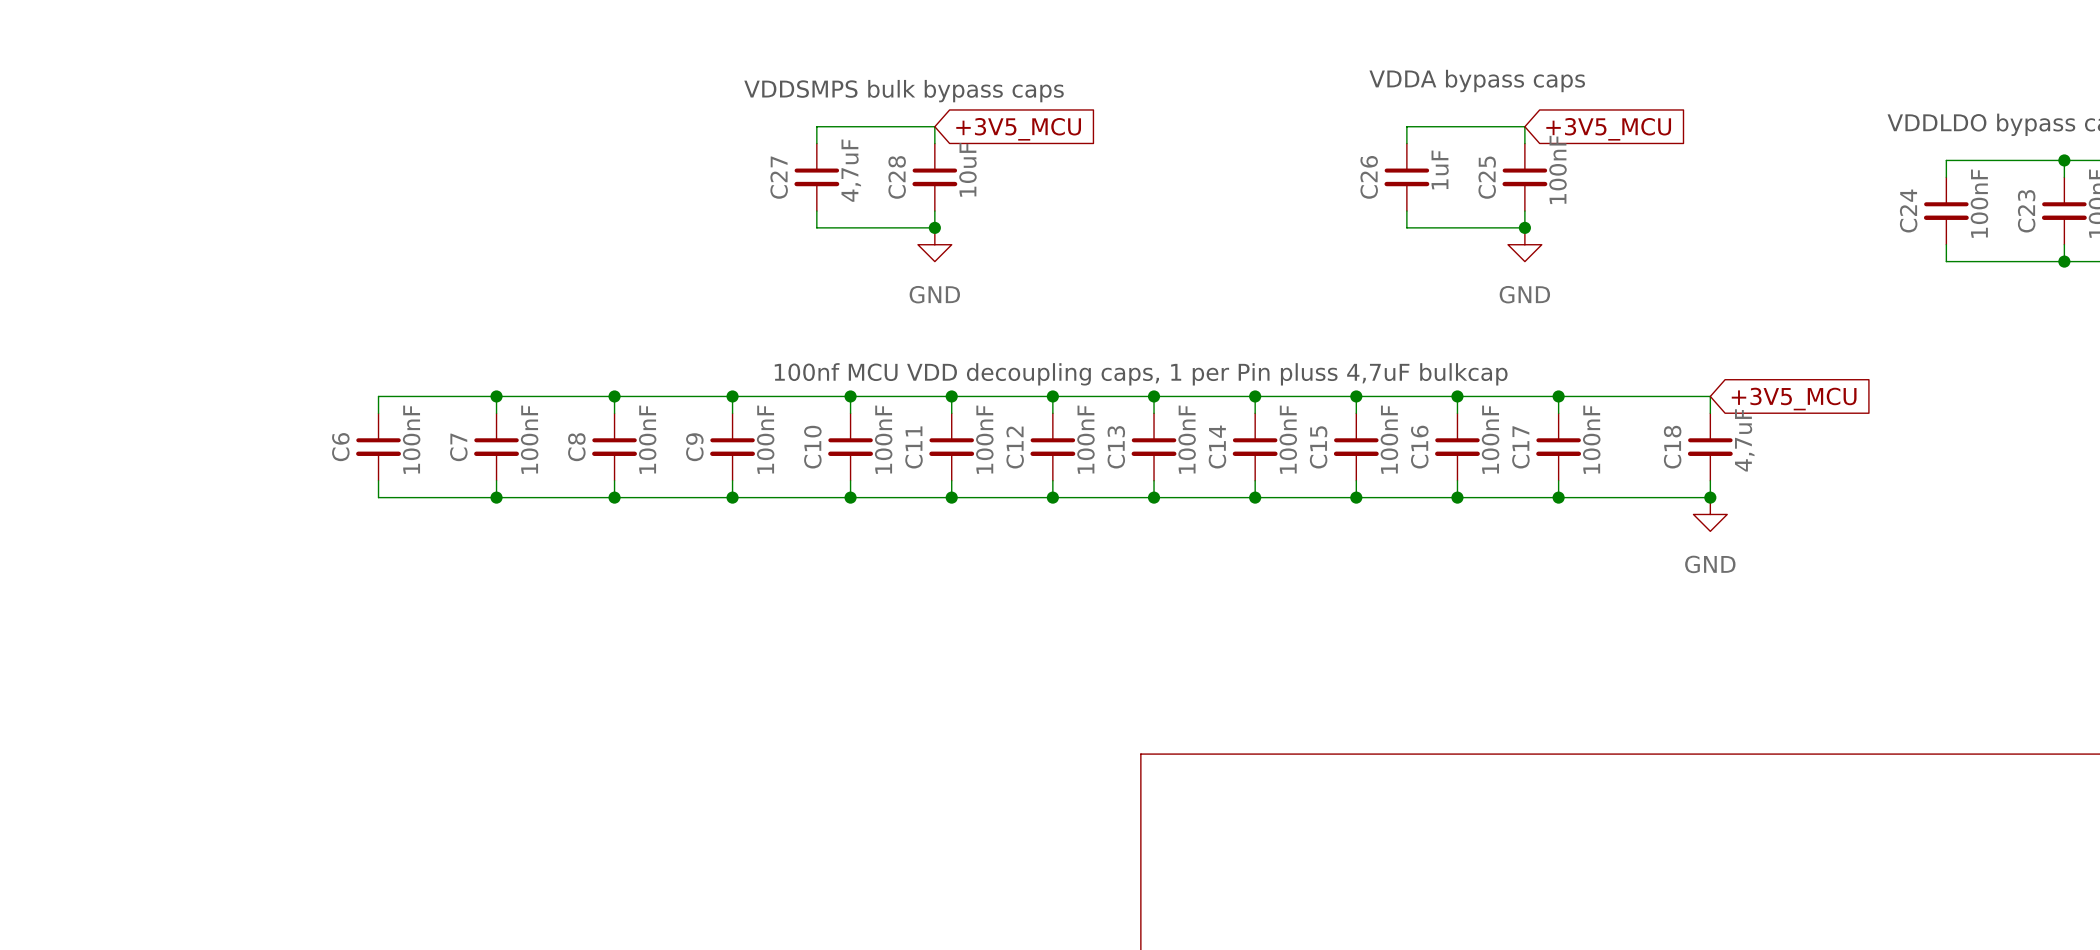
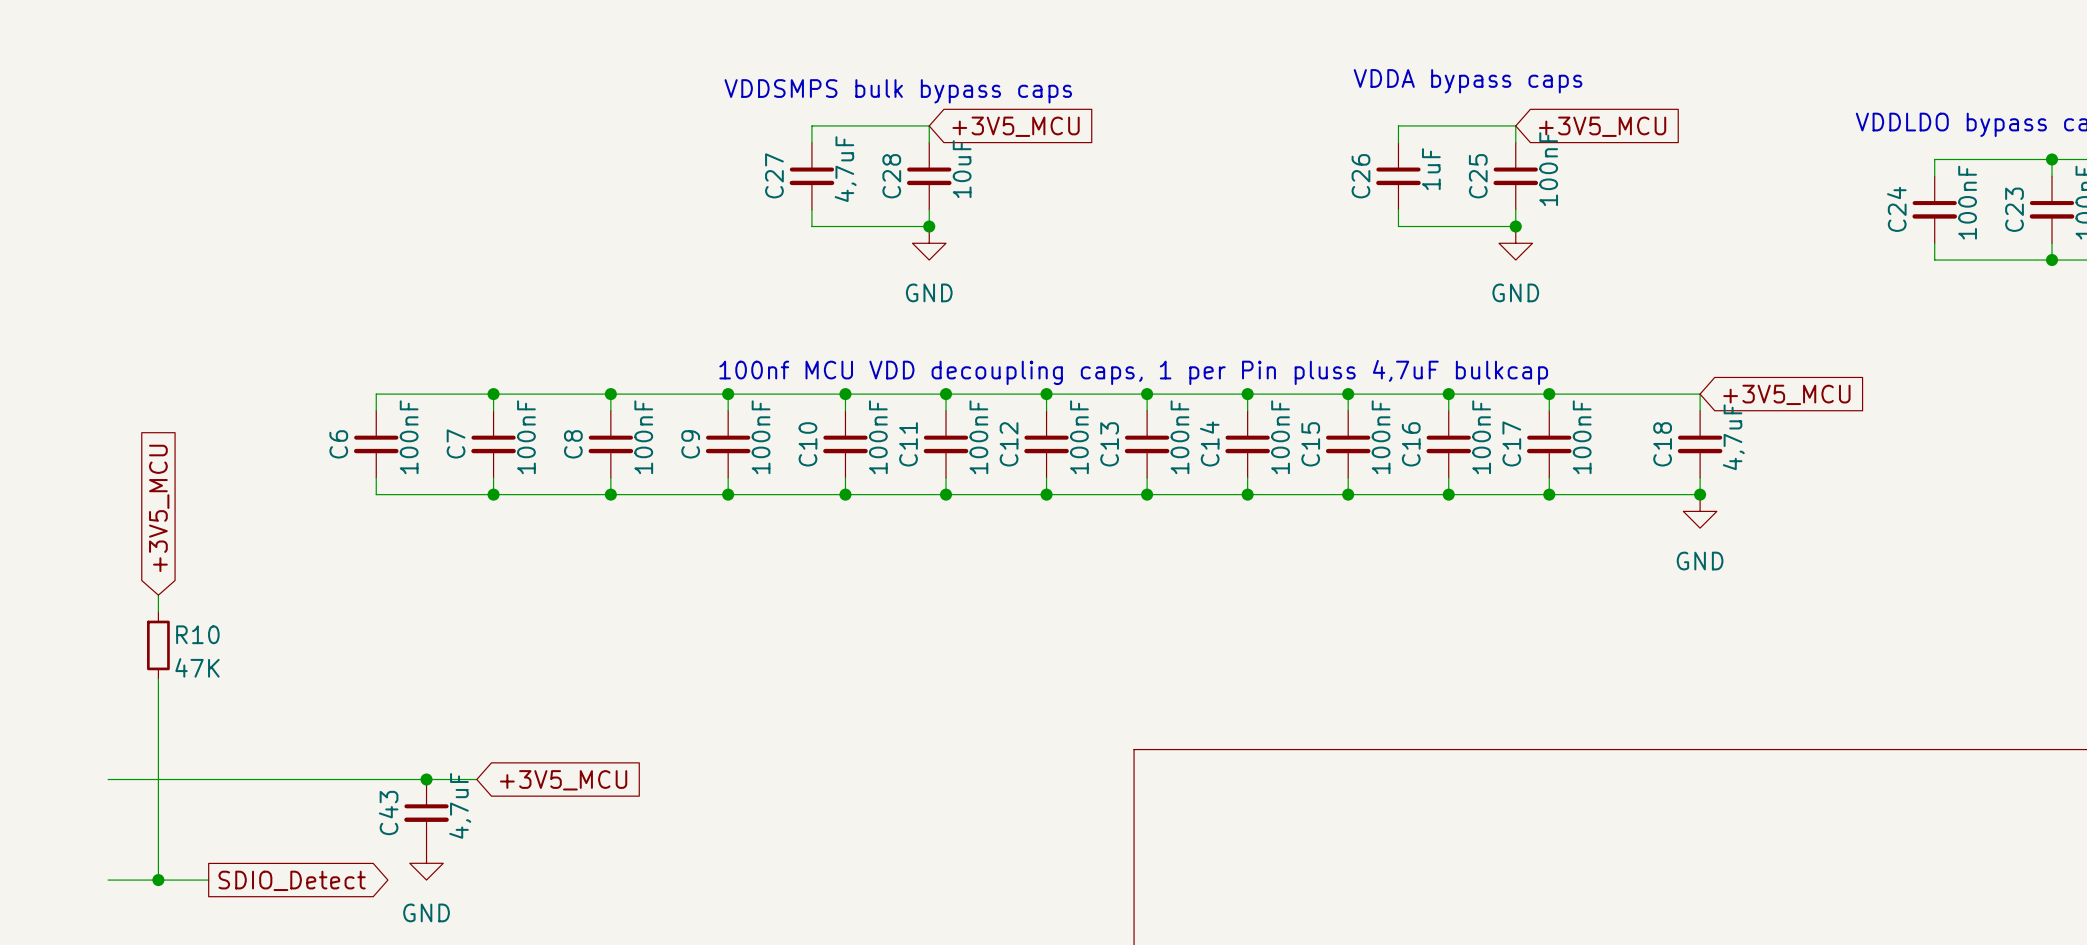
global label: none -> +3V5_MCU (159, 508)
wire: none -> (158, 595) (158, 611)
R10: none -> 47K (158, 645)
wire: none -> (158, 678) (158, 880)
wire: none -> (108, 779) (476, 779)
junction: none -> (426, 779)
global label: none -> +3V5_MCU (563, 780)
C43: none -> 4,7uF (426, 813)
power symbol: none -> GND (426, 863)
wire: none -> (108, 880) (208, 880)
junction: none -> (158, 880)
global label: none -> SDIO_Detect (292, 880)

